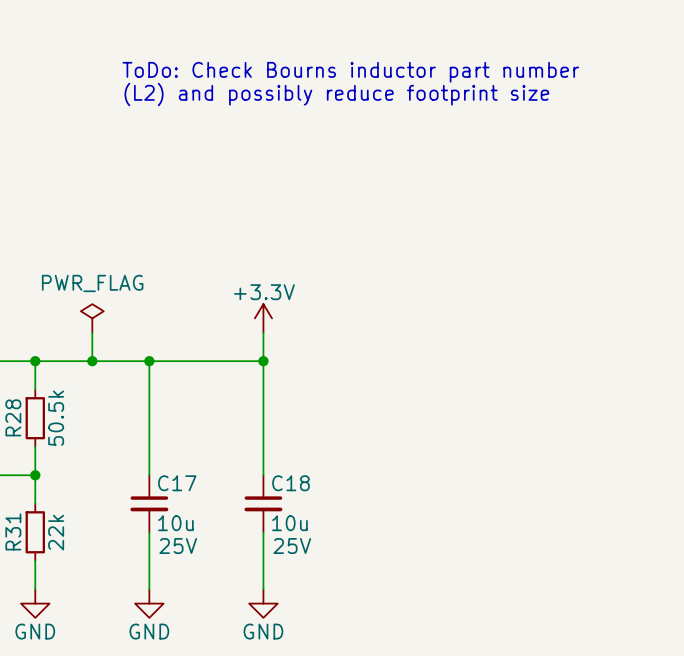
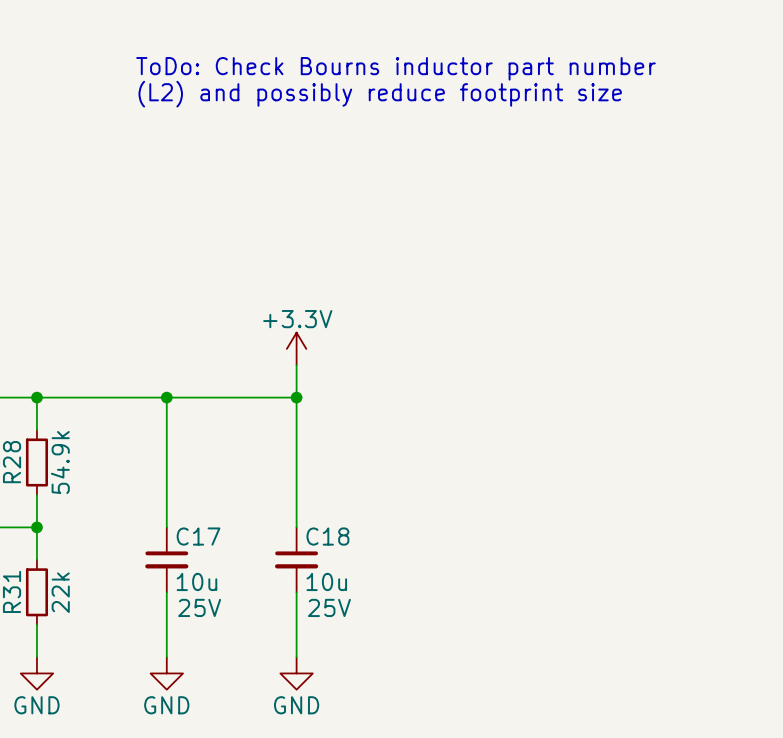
power symbol: PWR_FLAG (92, 318) -> none
wire: (92, 332) (92, 361) -> none
junction: (92, 361) -> none
R28 value: 50.5k (56, 418) -> 54.9k (60, 462)

